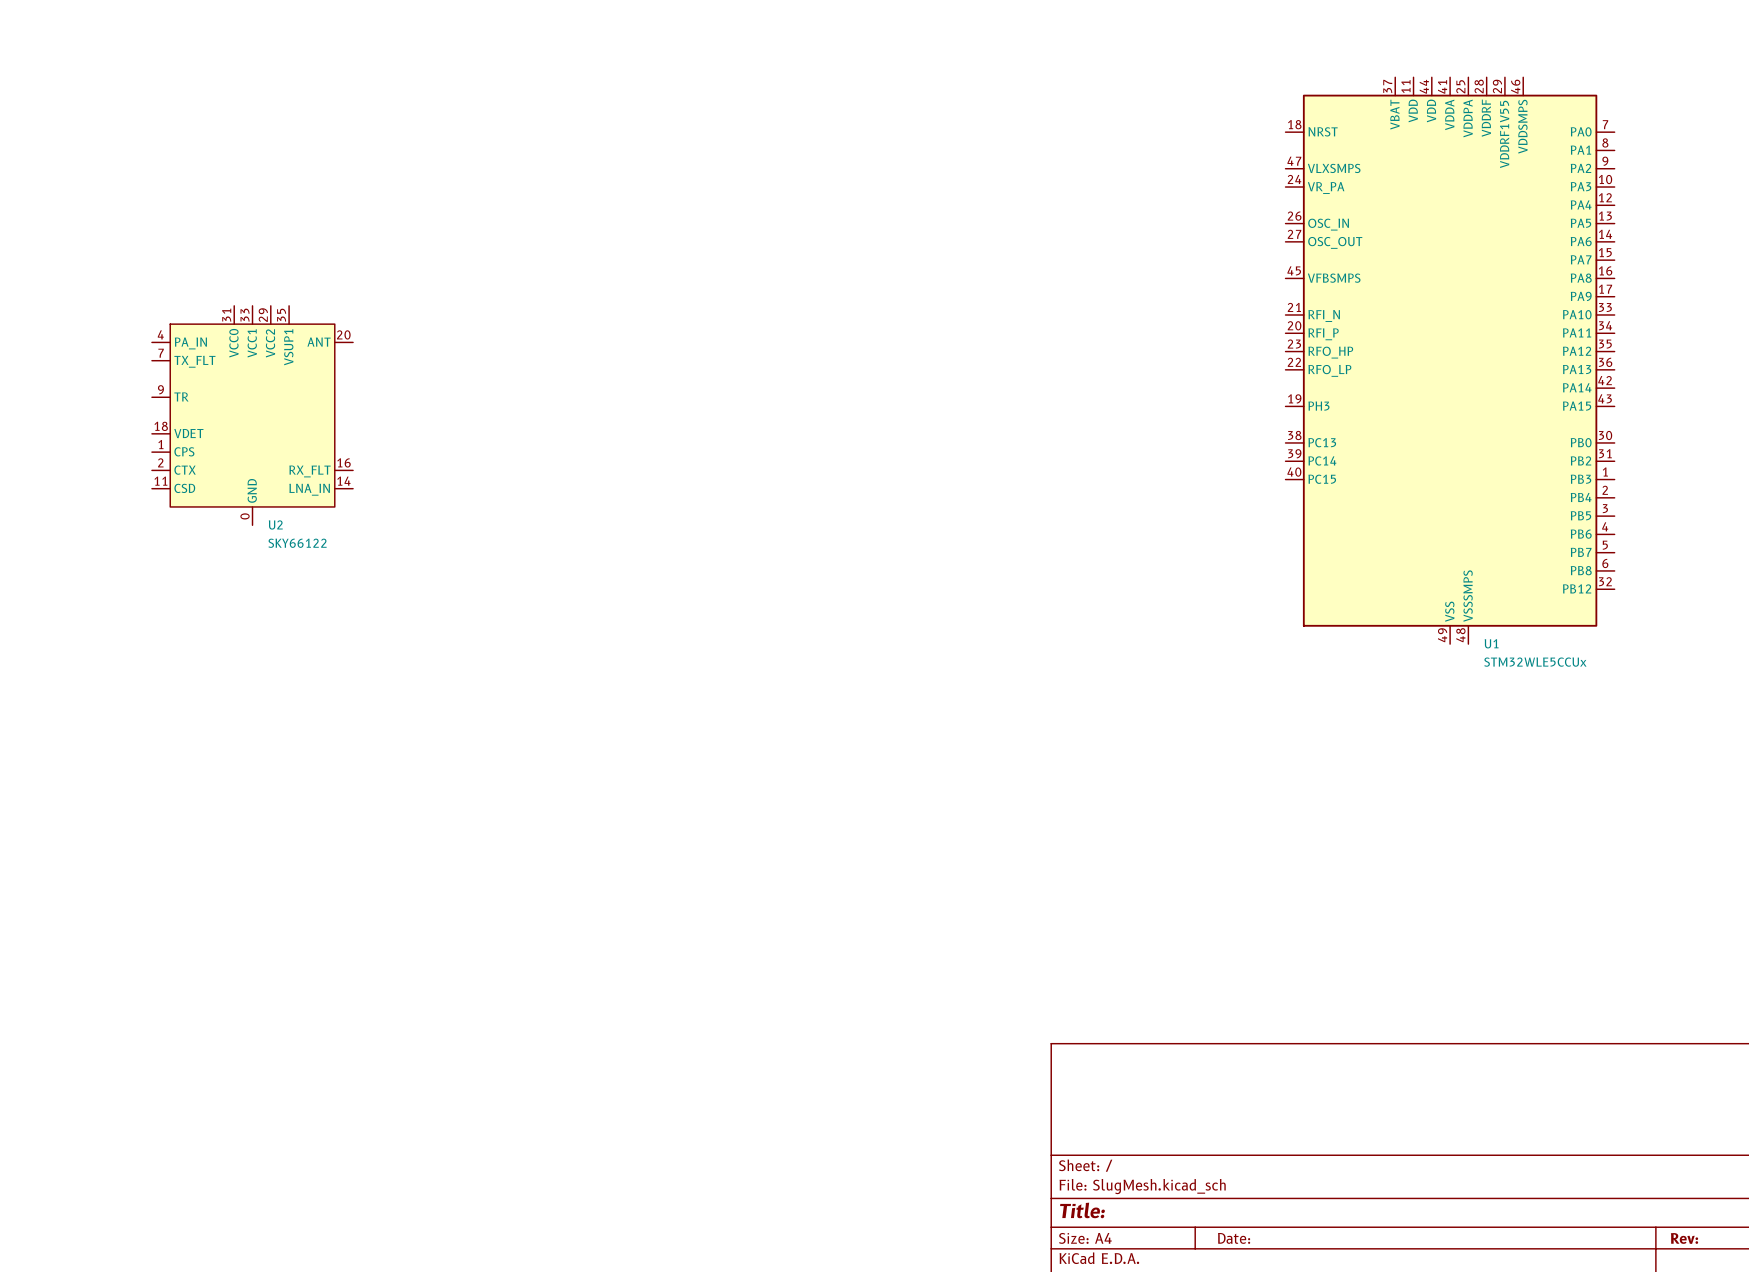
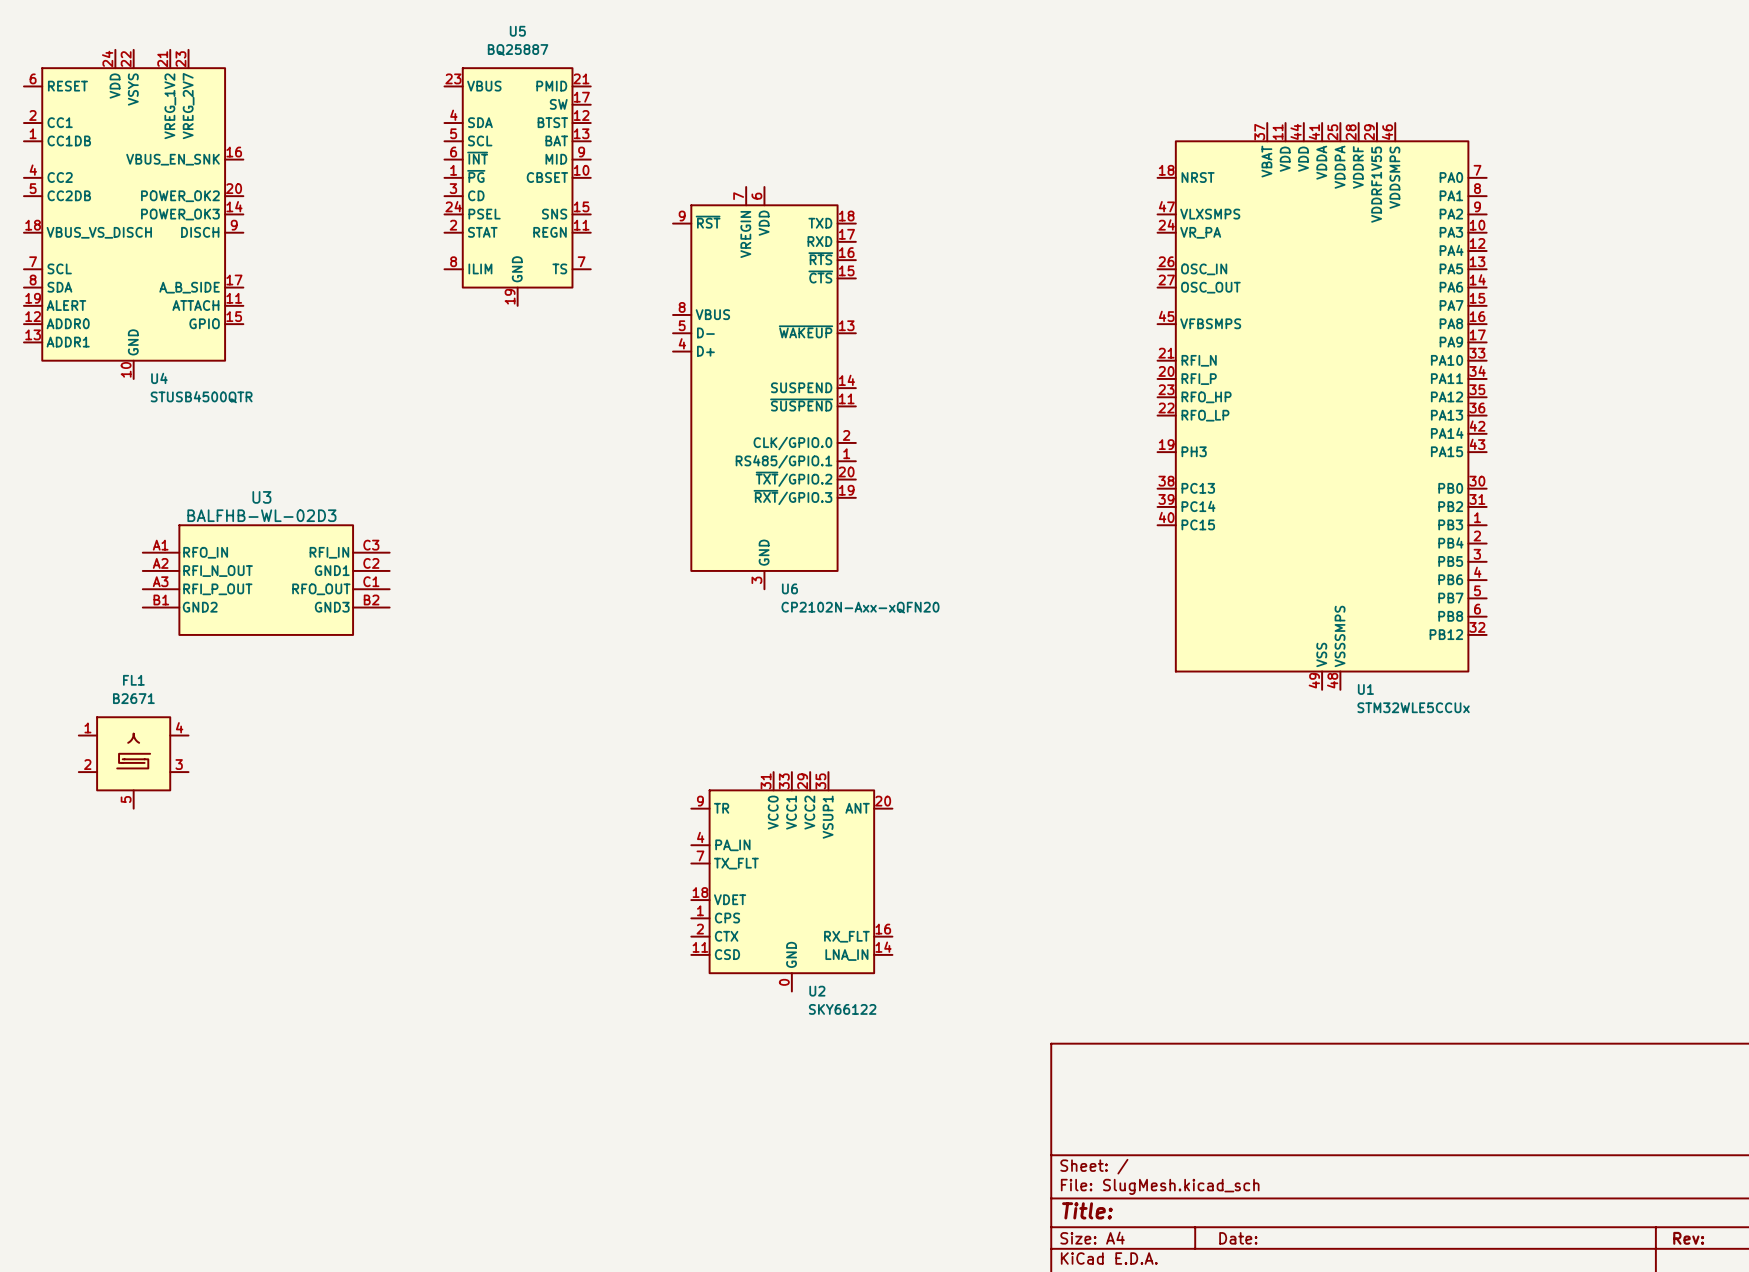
U5: none -> BQ25887 (517, 187)
U4: none -> STUSB4500QTR (133, 214)
U2 symbol: [151, 305, 354, 526] -> [691, 772, 893, 992]
U1 position: (1450, 360) -> (1322, 406)
U6: none -> CP2102N-Axx-xQFN20 (764, 388)
U3: none -> BALFHB-WL-02D3 (266, 580)
FL1: none -> B2671 (133, 762)

